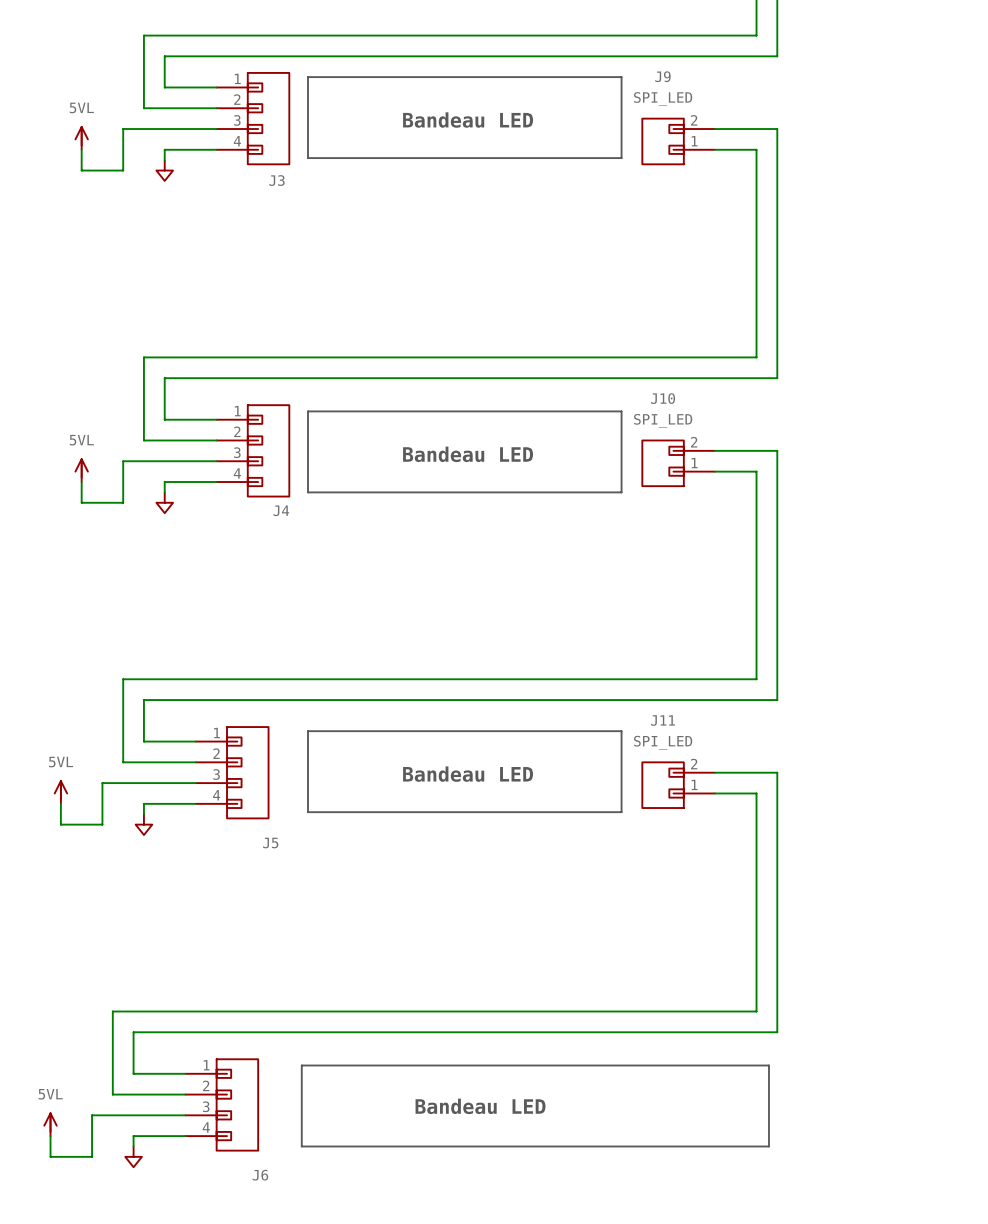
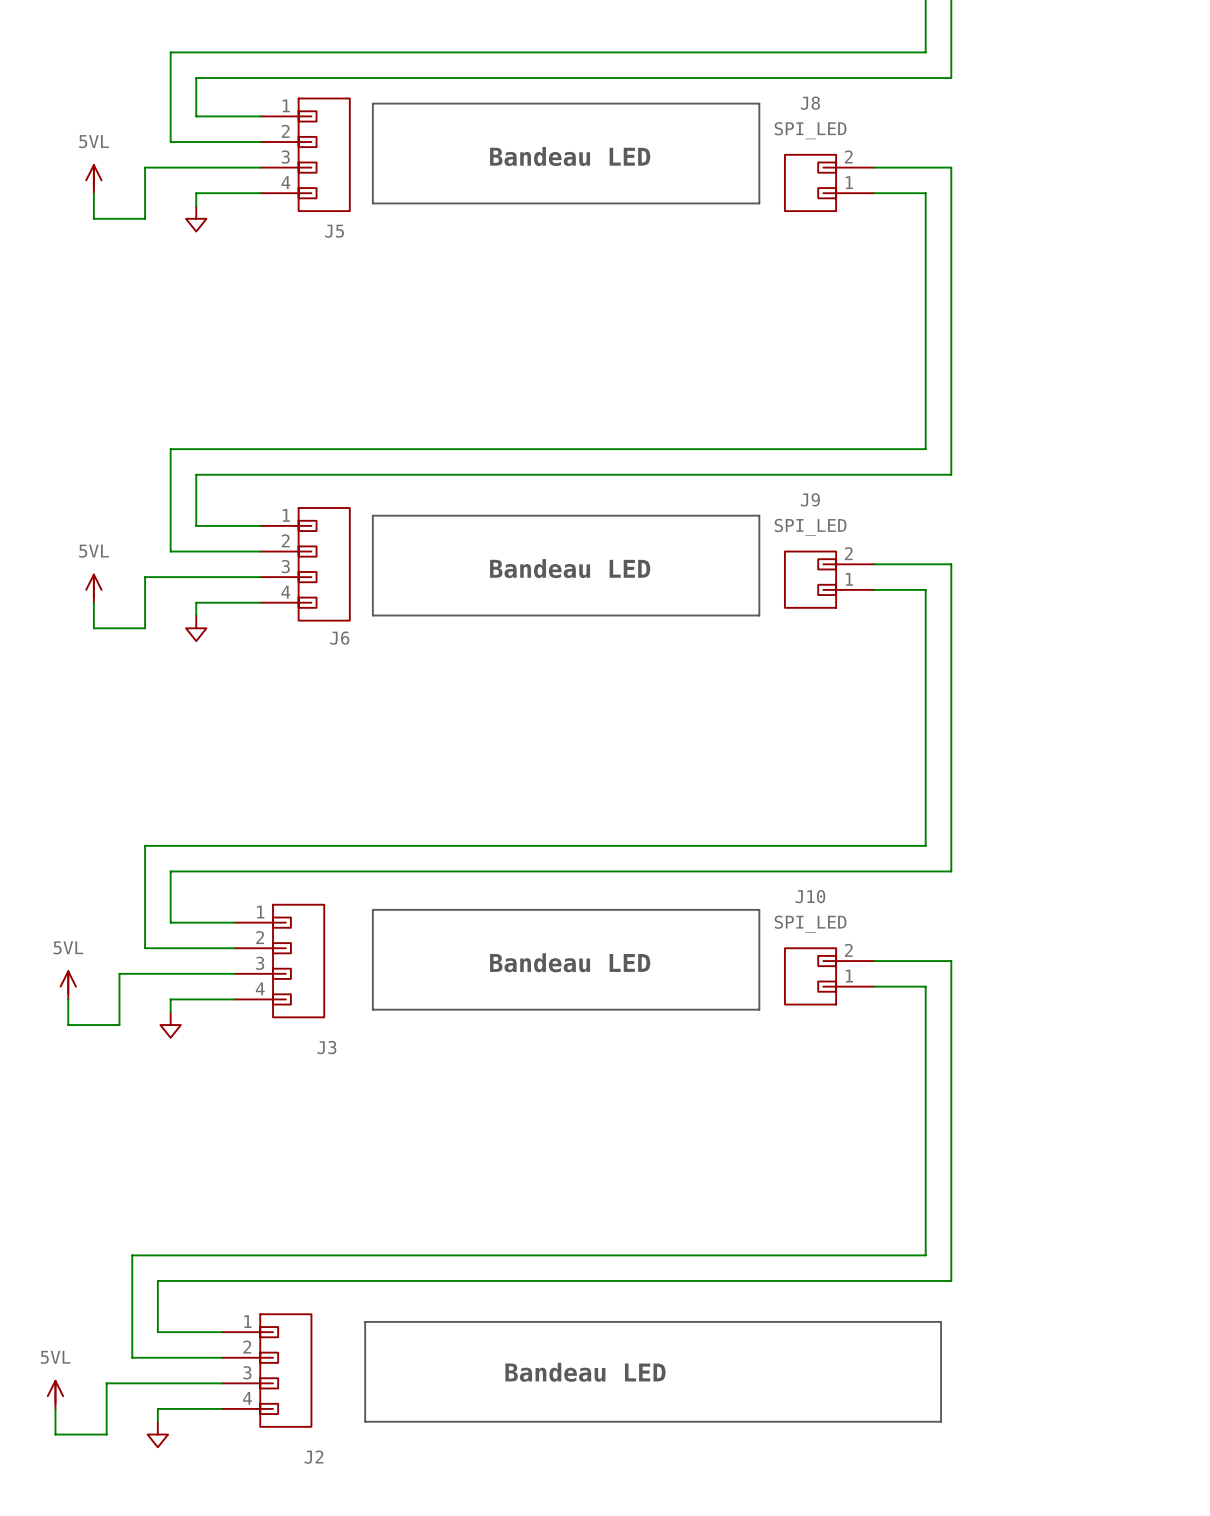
J9 name: J9 (662, 76) -> J8 (810, 103)
J3 name: J3 (276, 180) -> J5 (334, 231)
J10 name: J10 (662, 398) -> J9 (810, 499)
J4 name: J4 (281, 510) -> J6 (339, 638)
J11 name: J11 (662, 720) -> J10 (810, 896)
J5 name: J5 (270, 843) -> J3 (326, 1047)
J6 name: J6 (260, 1175) -> J2 (314, 1457)

